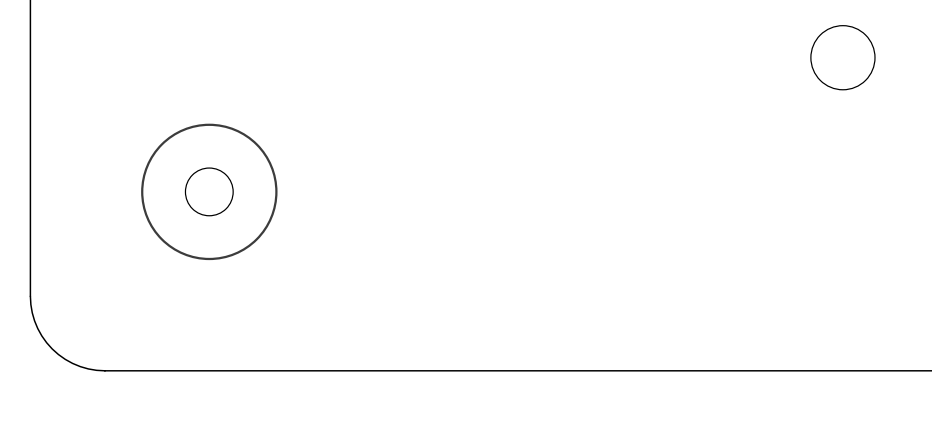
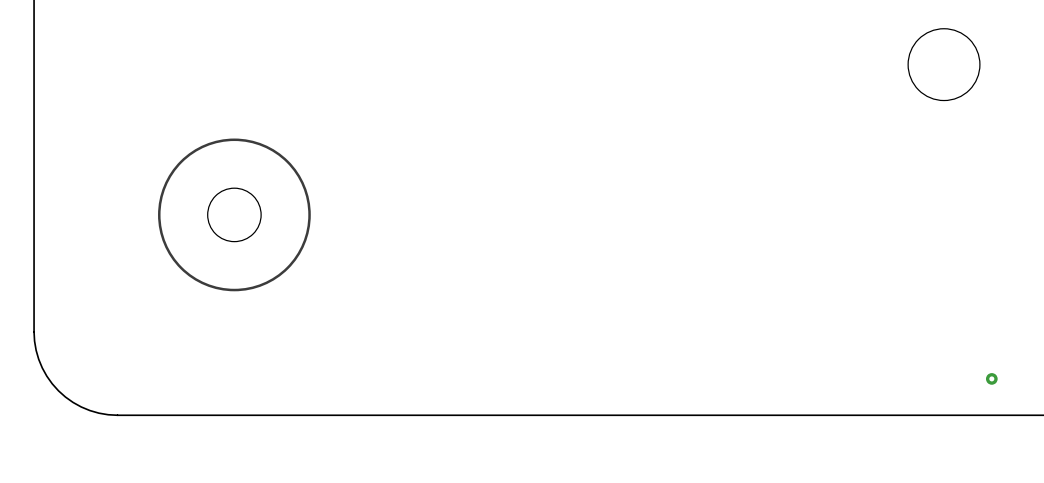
via: none -> (991, 378)

